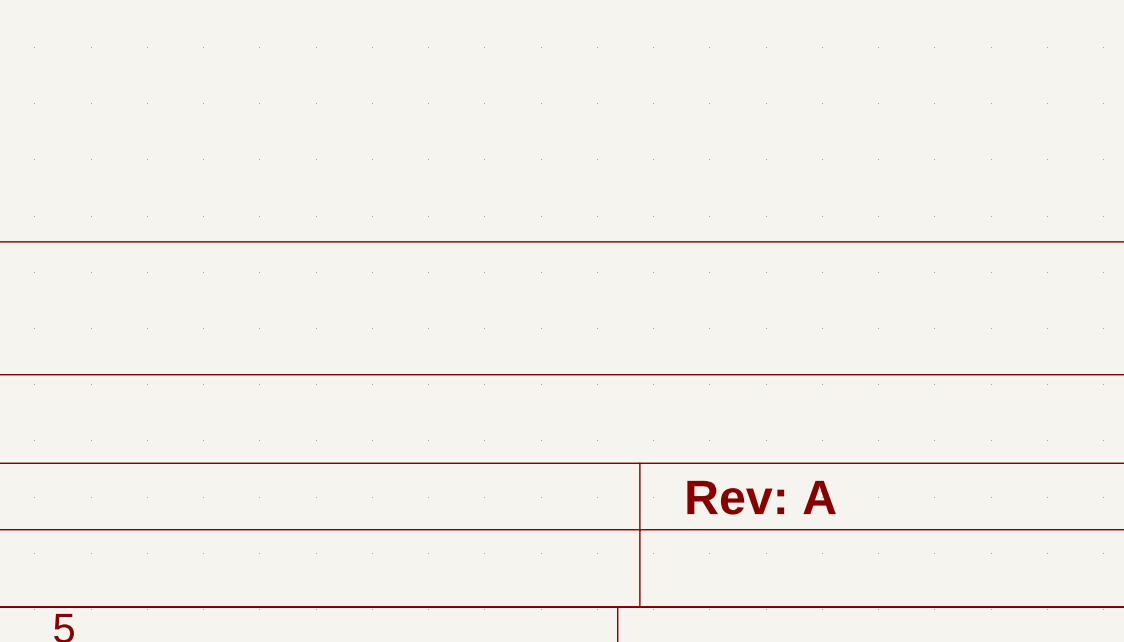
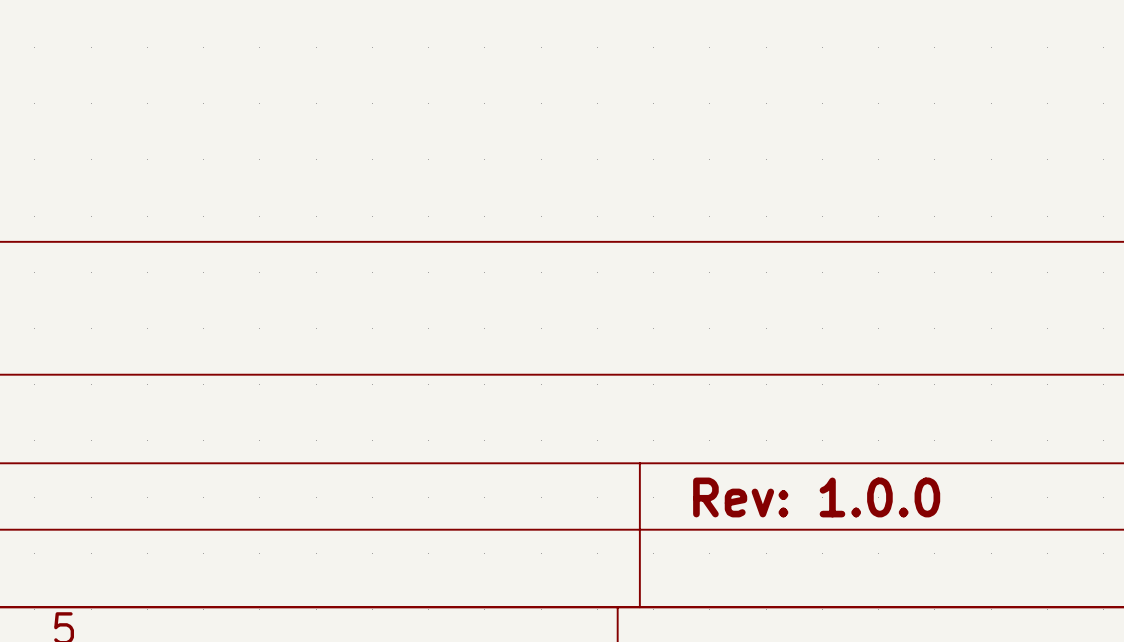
title block: Rev: A (761, 497) -> Rev: 1.0.0 (816, 497)

